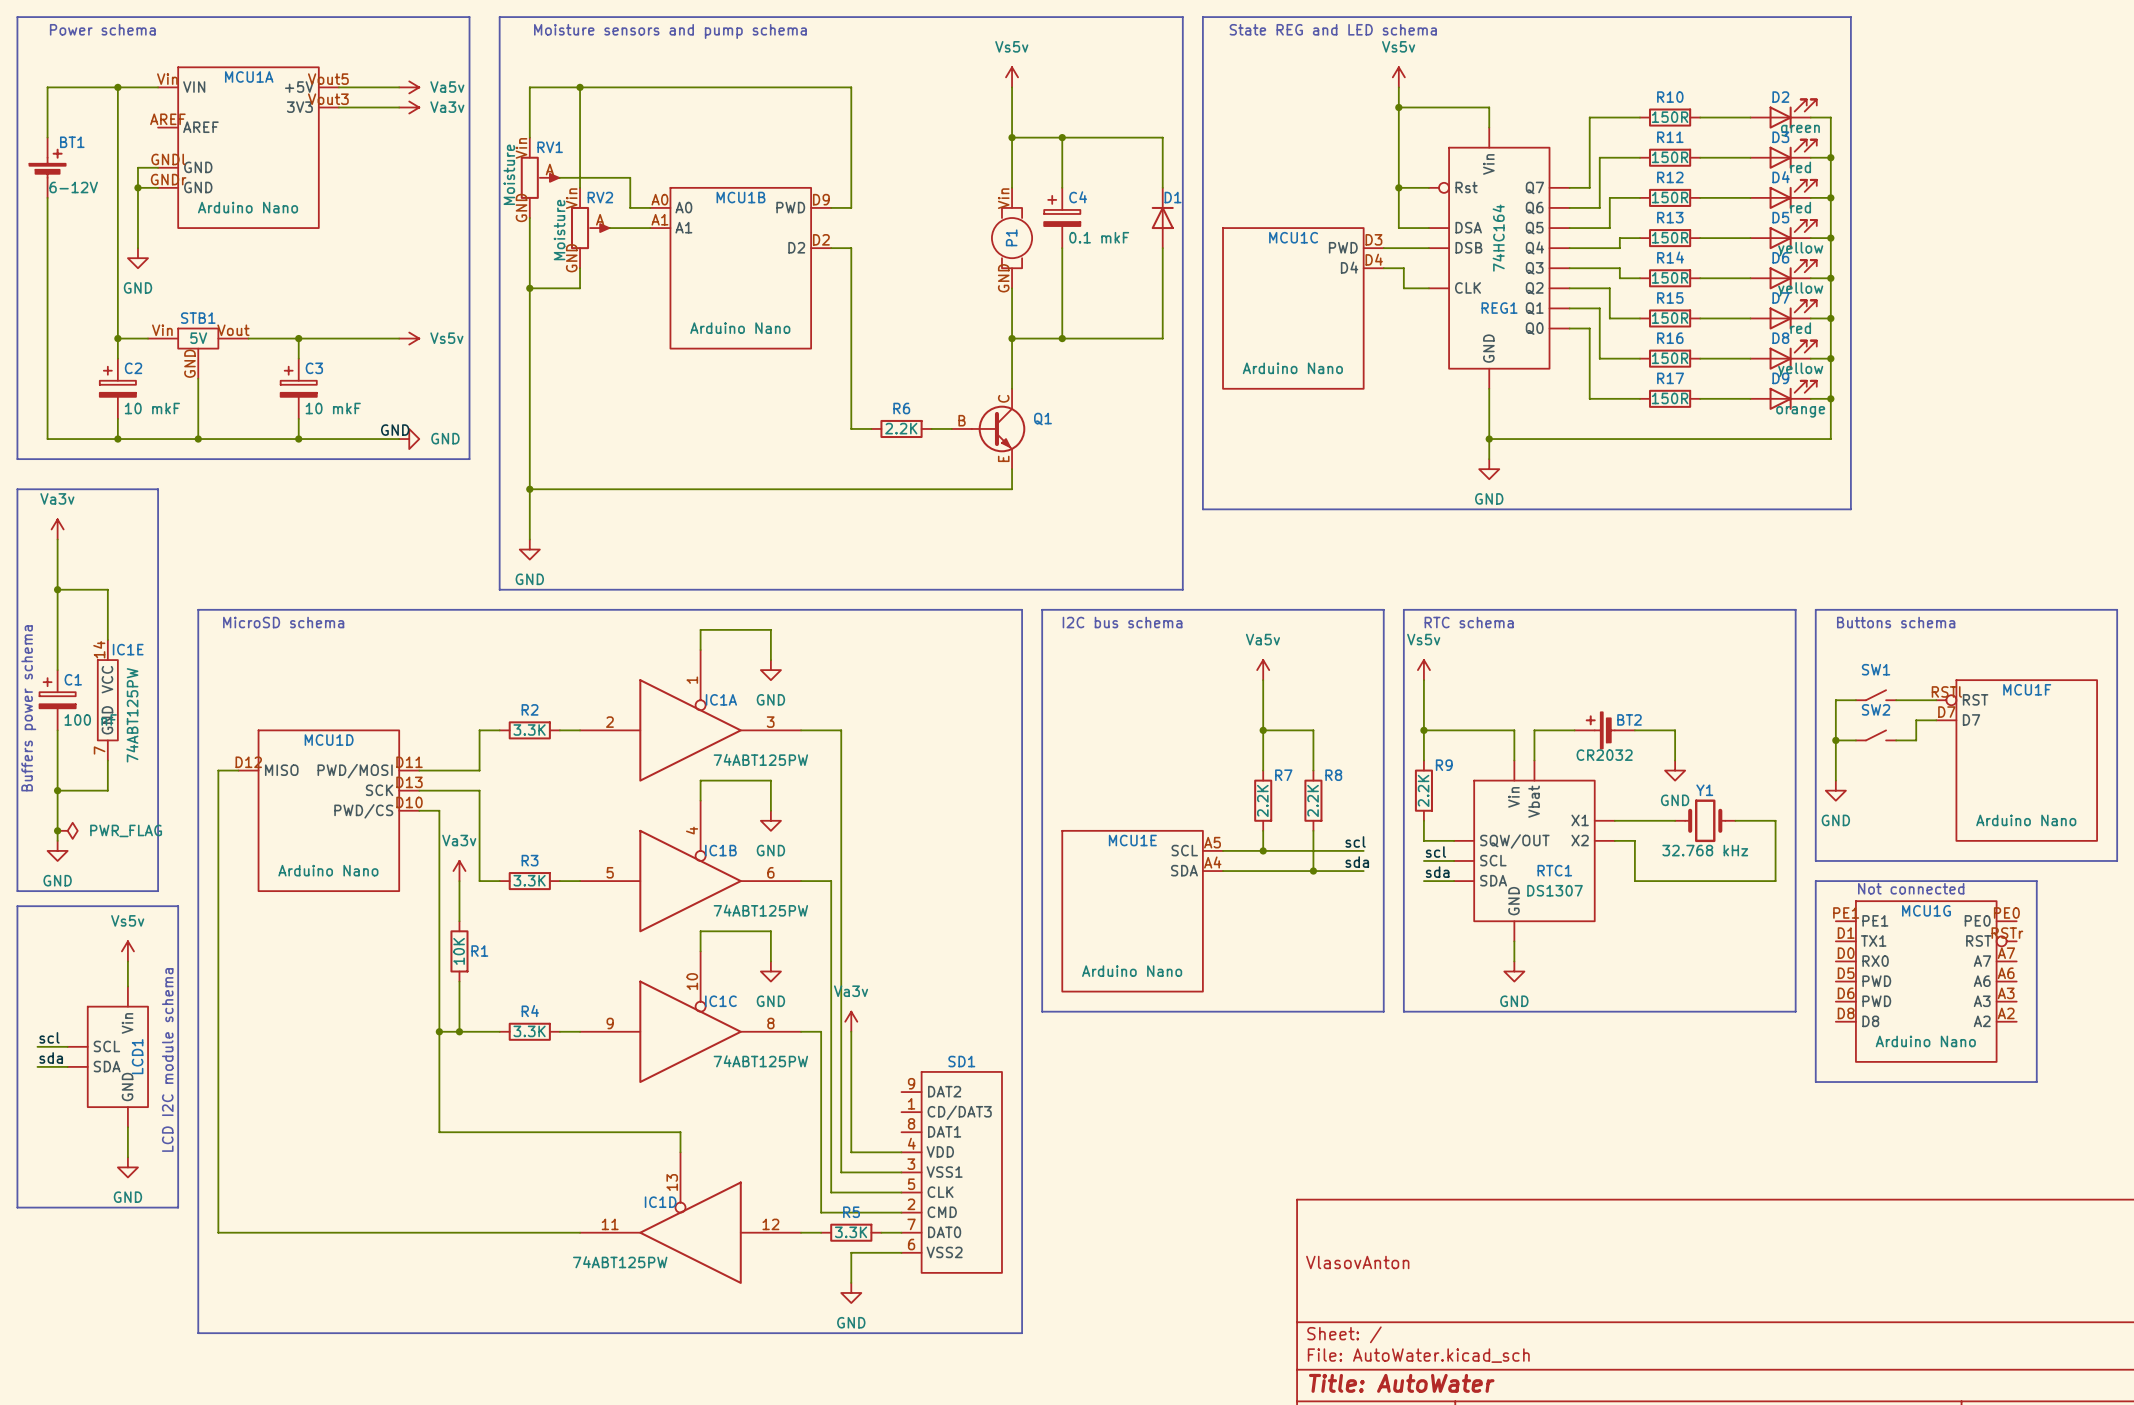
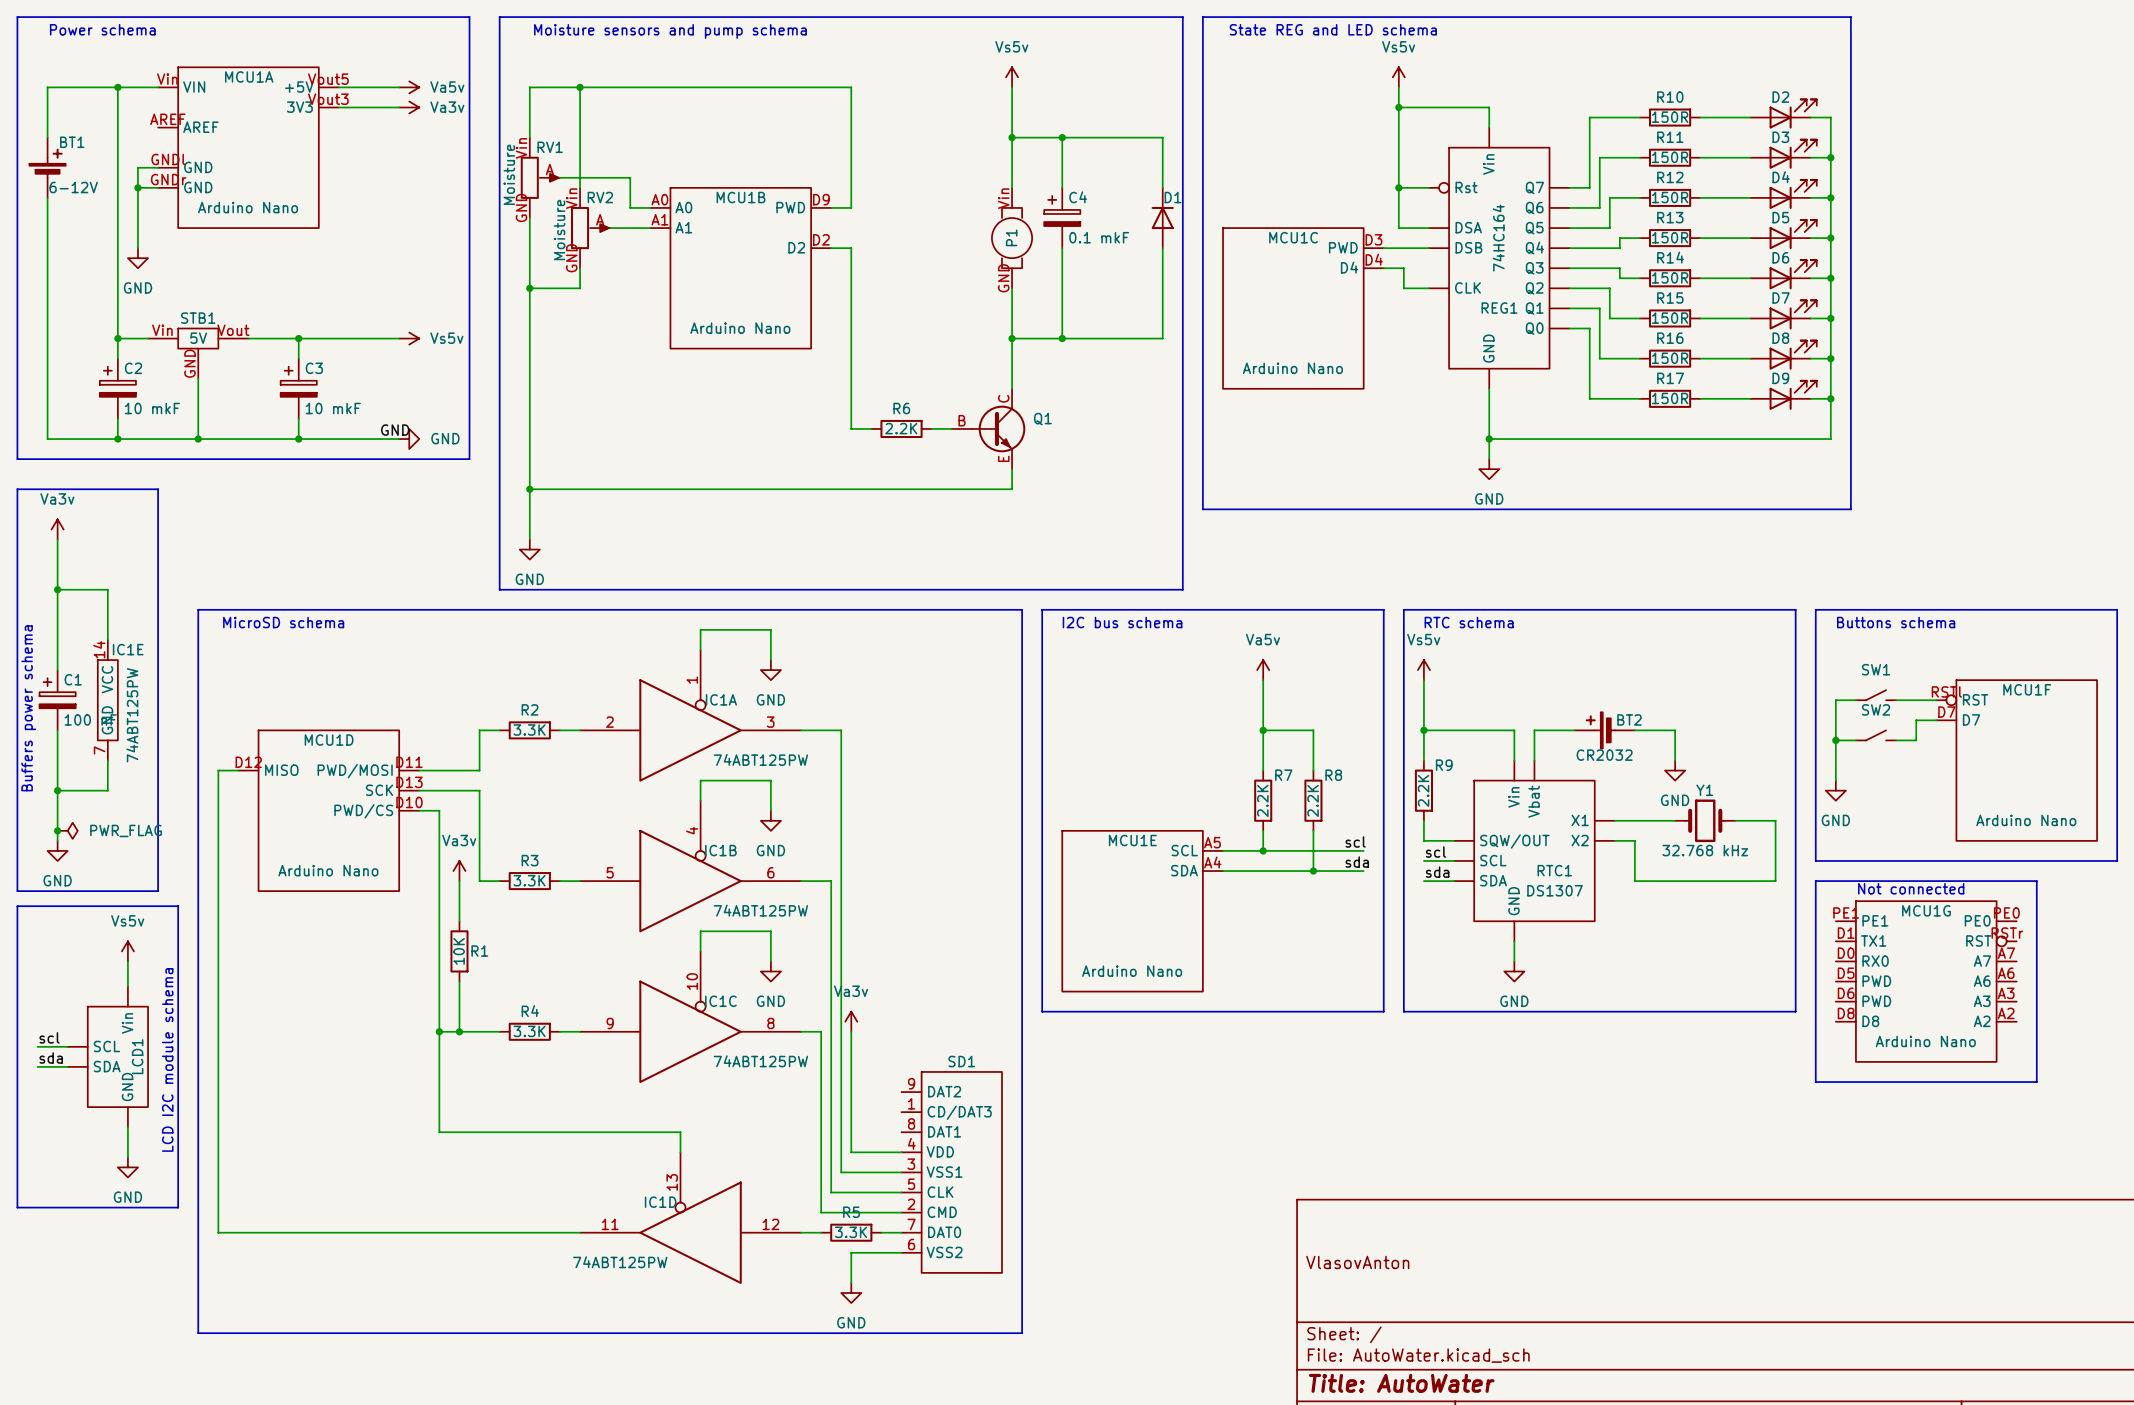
D2 value: green (1800, 130) -> none
D3 value: red (1800, 167) -> none
D4 value: red (1800, 207) -> none
D5 value: yellow (1800, 249) -> none
D6 value: yellow (1800, 289) -> none
D7 value: red (1800, 328) -> none
D8 value: yellow (1800, 370) -> none
D9 value: orange (1800, 411) -> none

